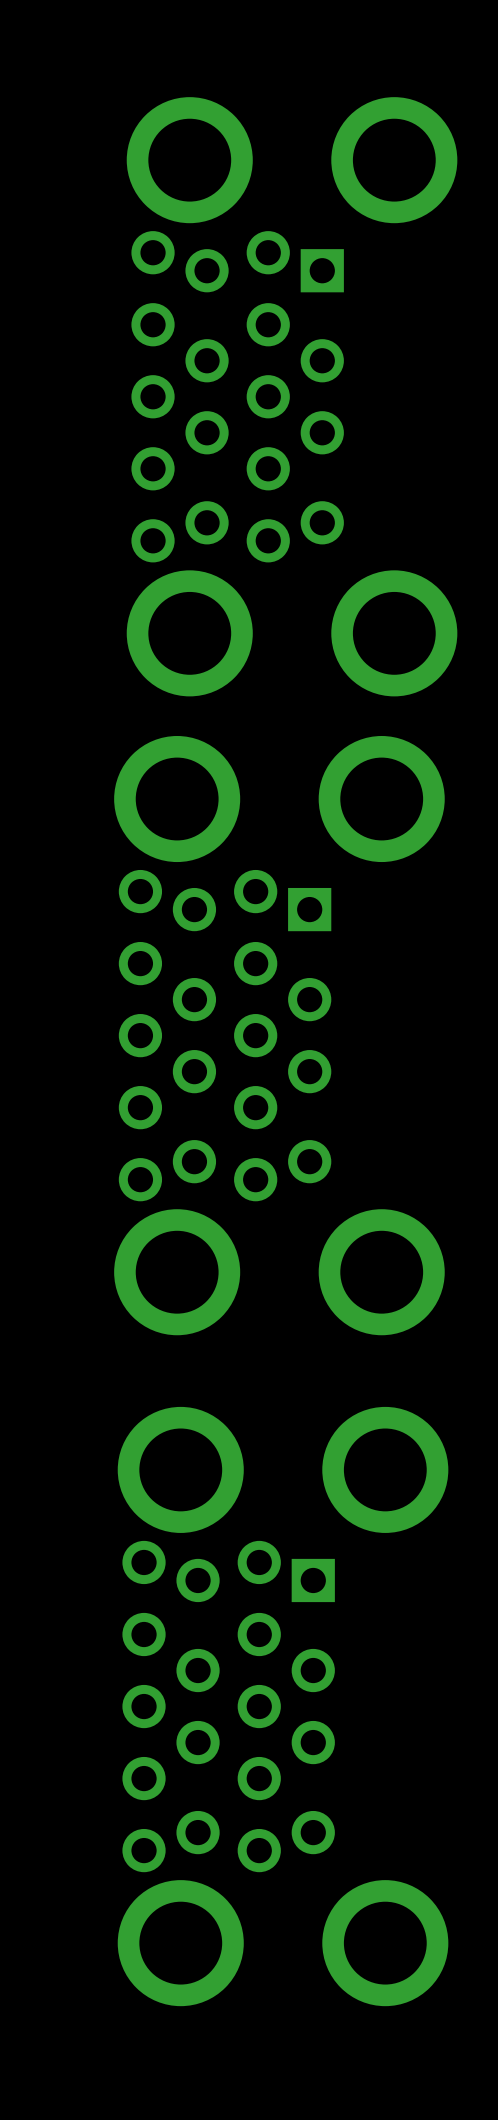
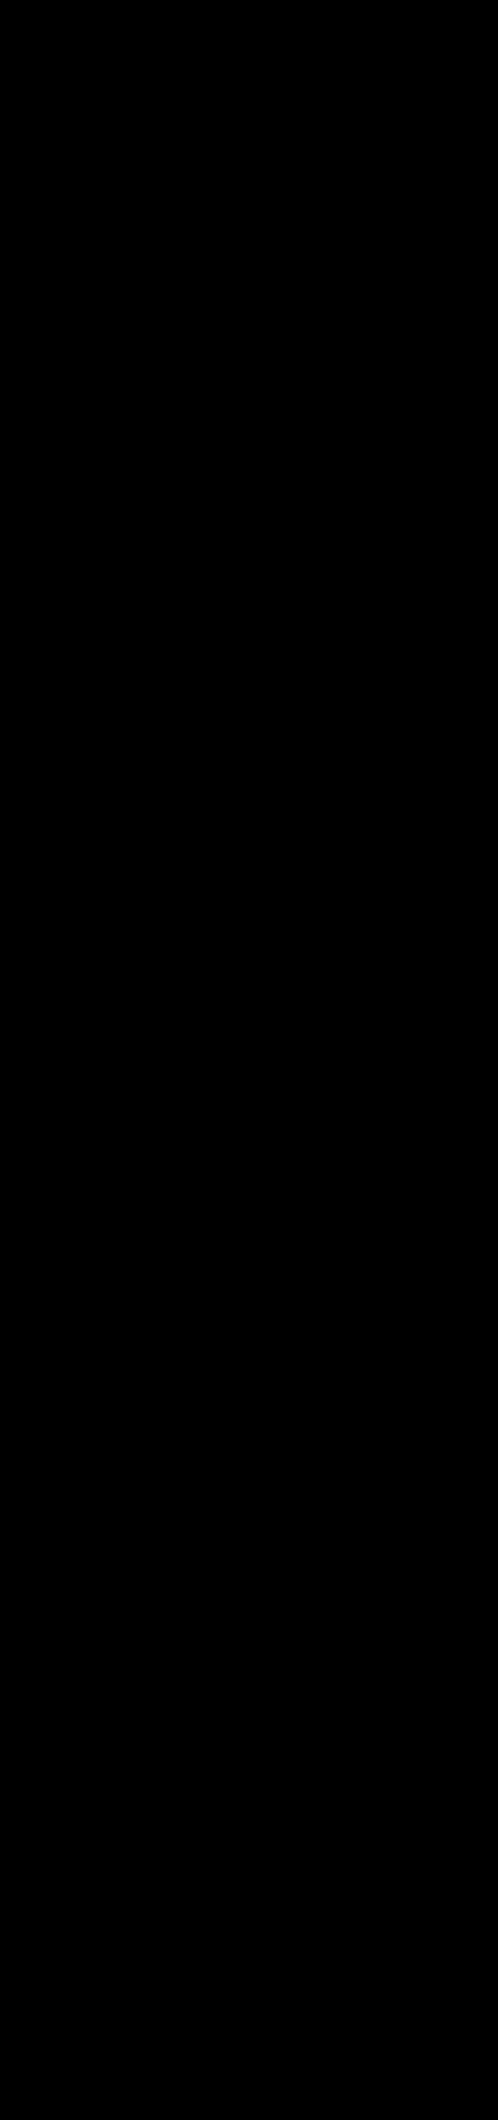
part: (292, 396) -> none
part: (279, 1035) -> none
part: (283, 1706) -> none

